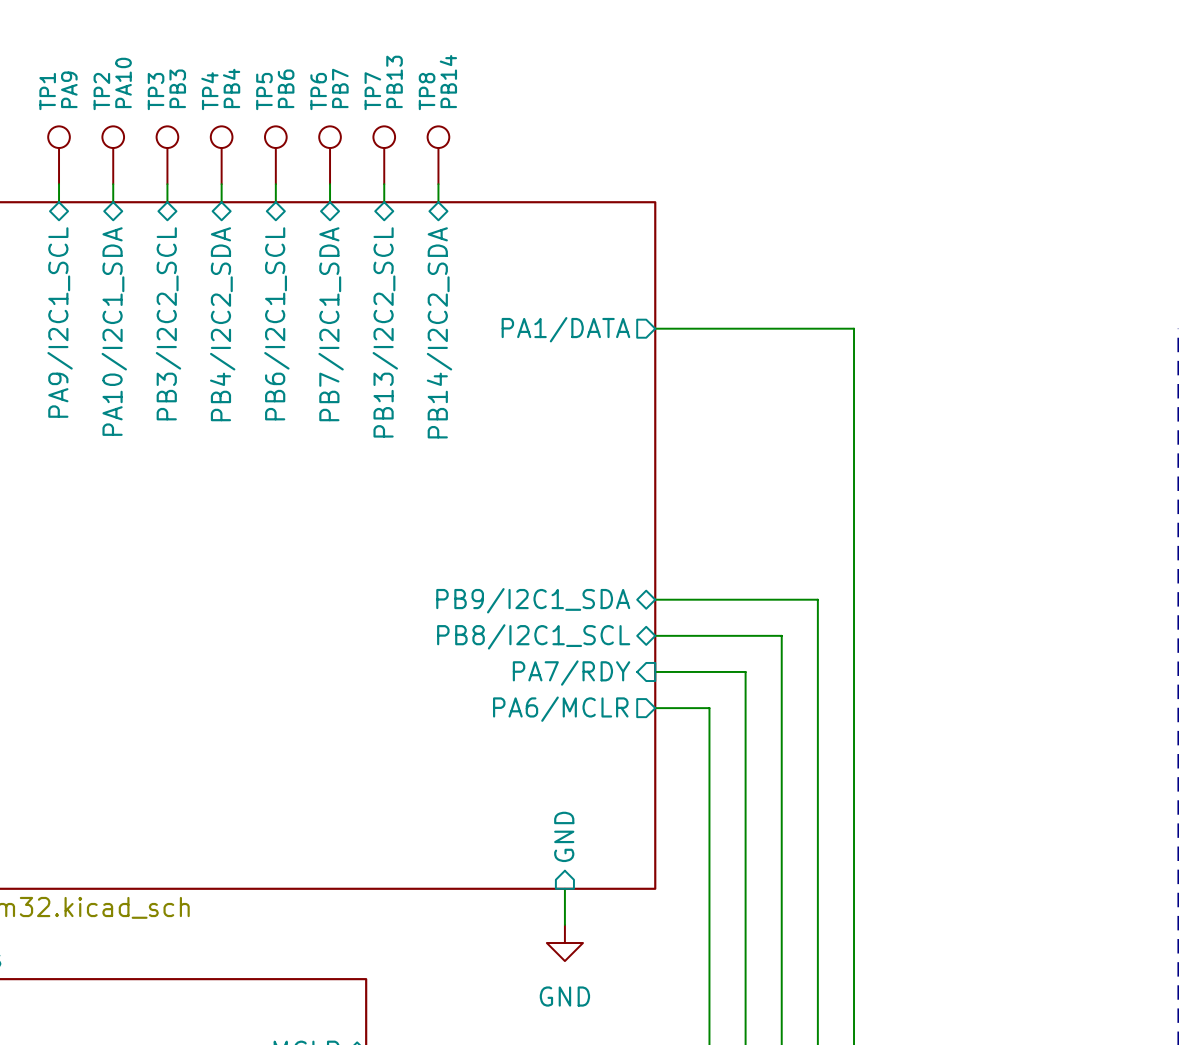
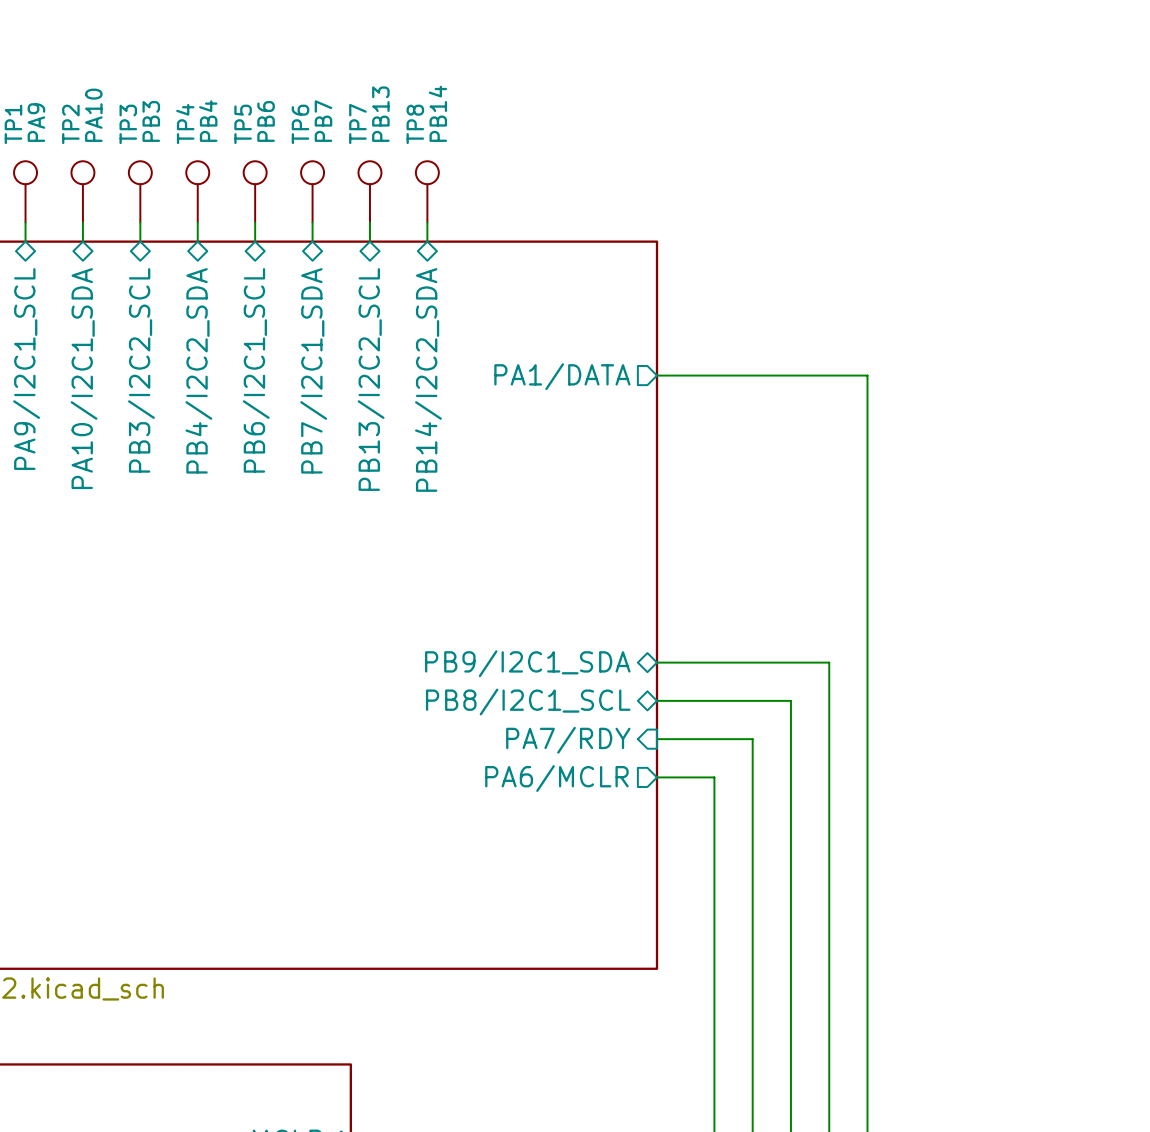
sheet pin: GND (564, 836) -> none
wire: (564, 888) (564, 924) -> none
power symbol: GND (564, 943) -> none

